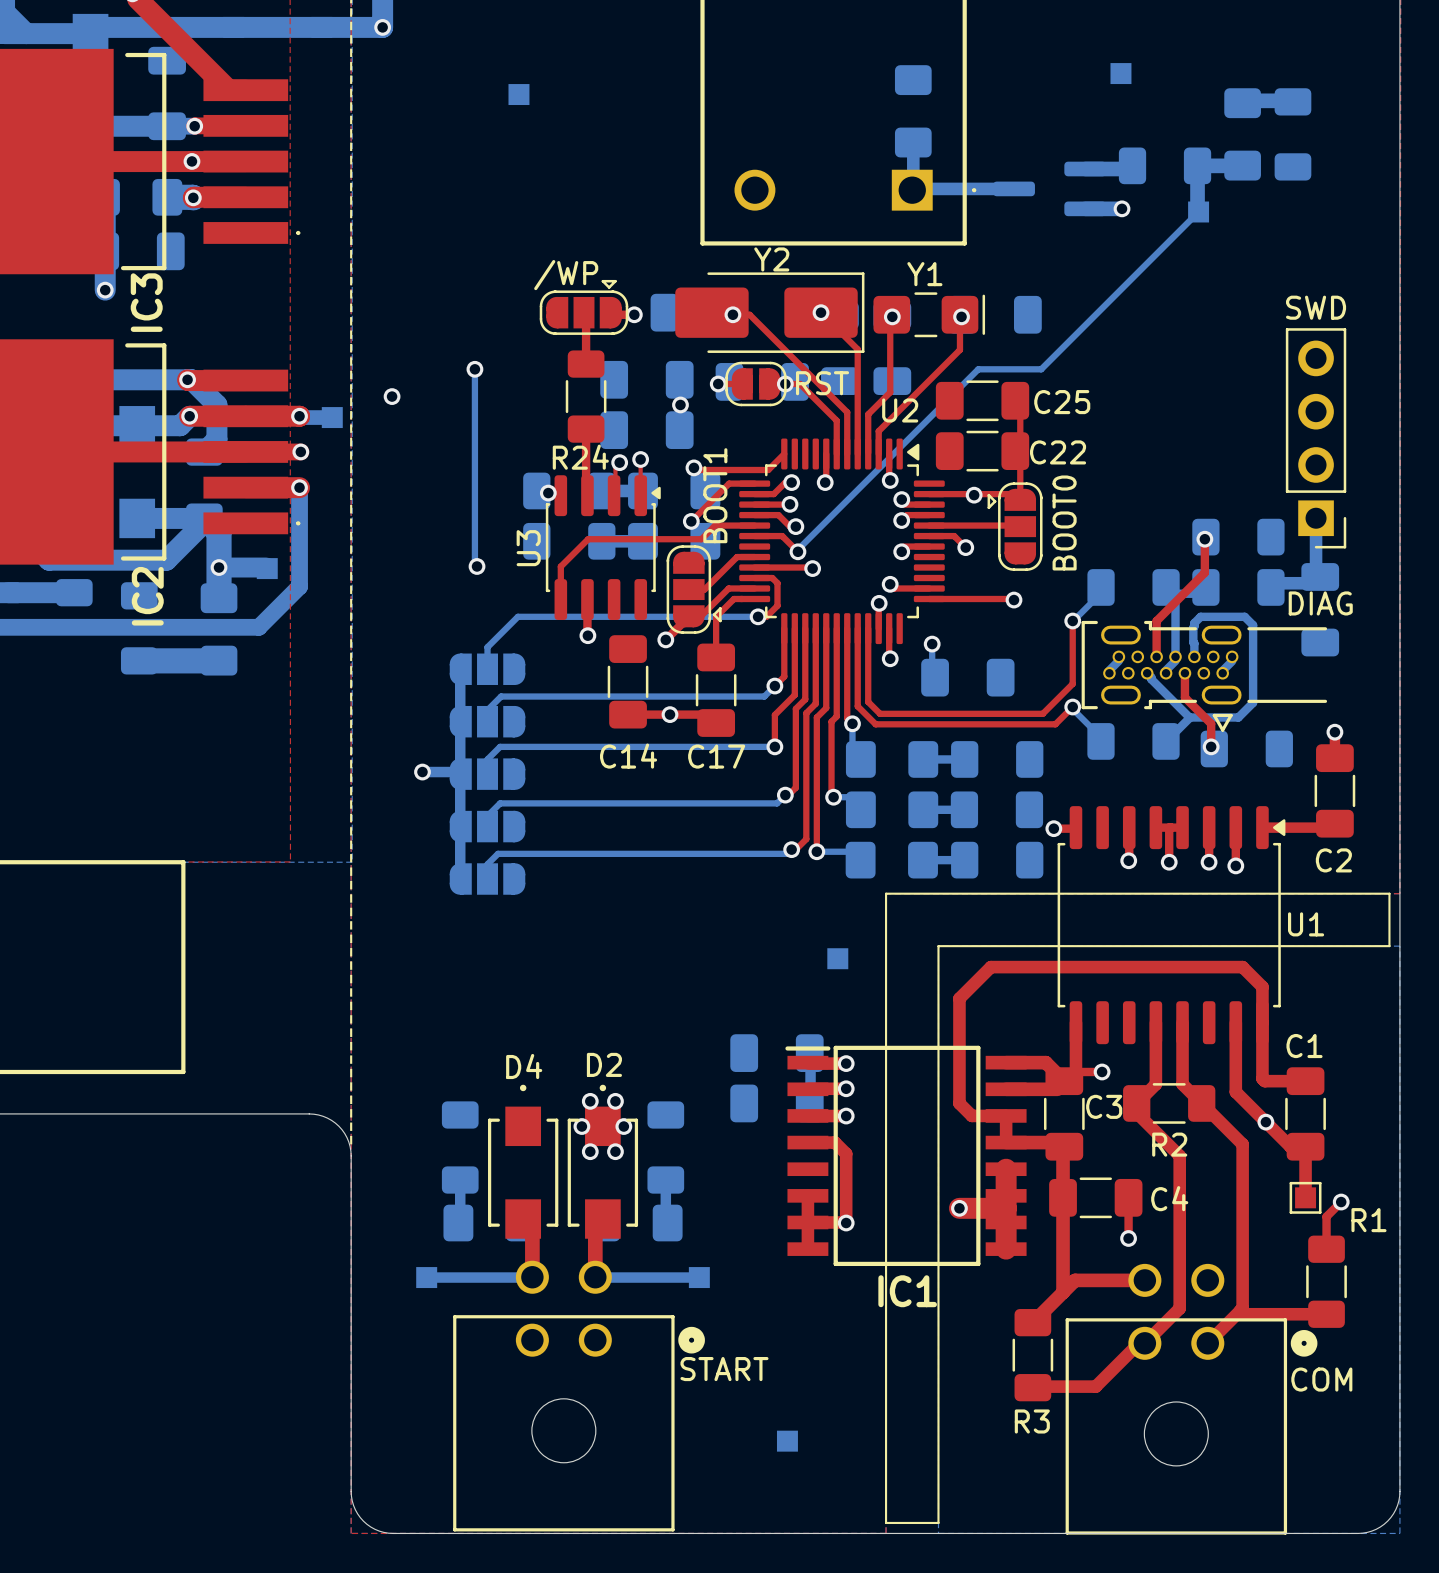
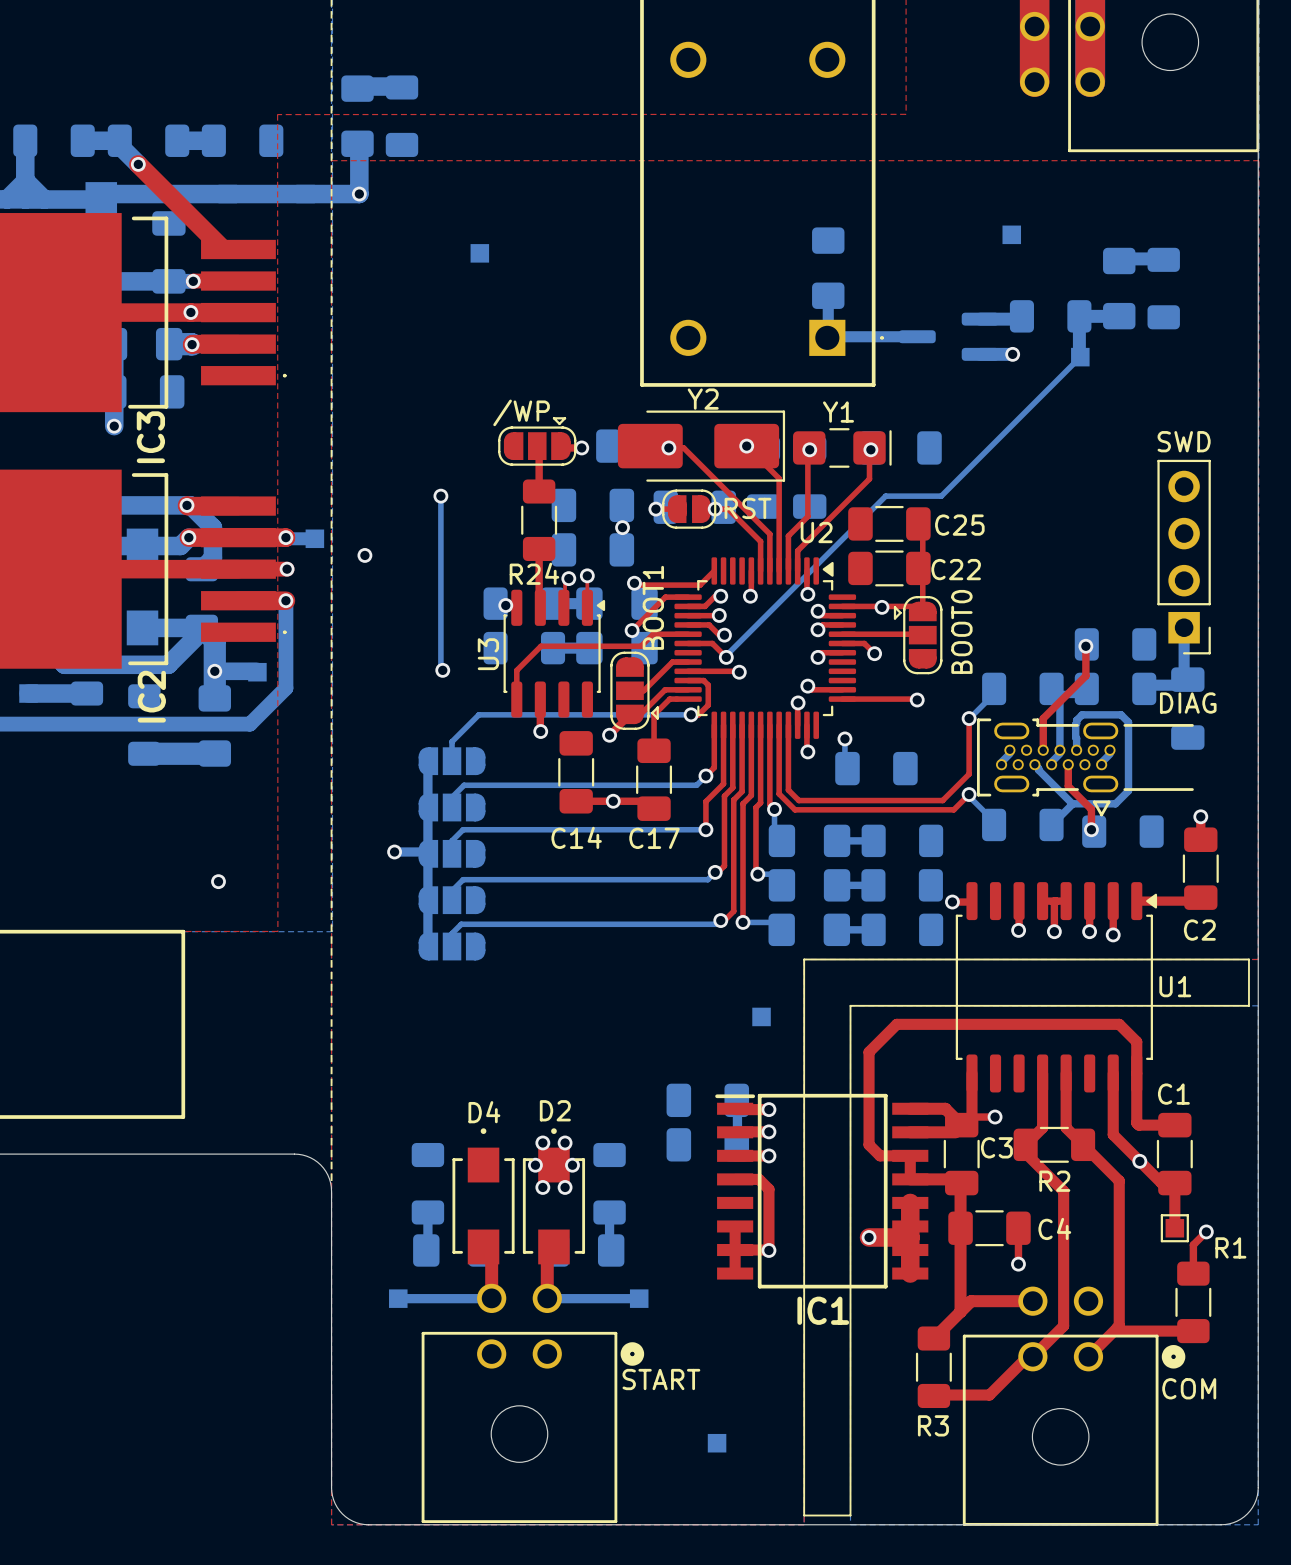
via position: (392, 396) -> (364, 555)
via: none -> (218, 881)

